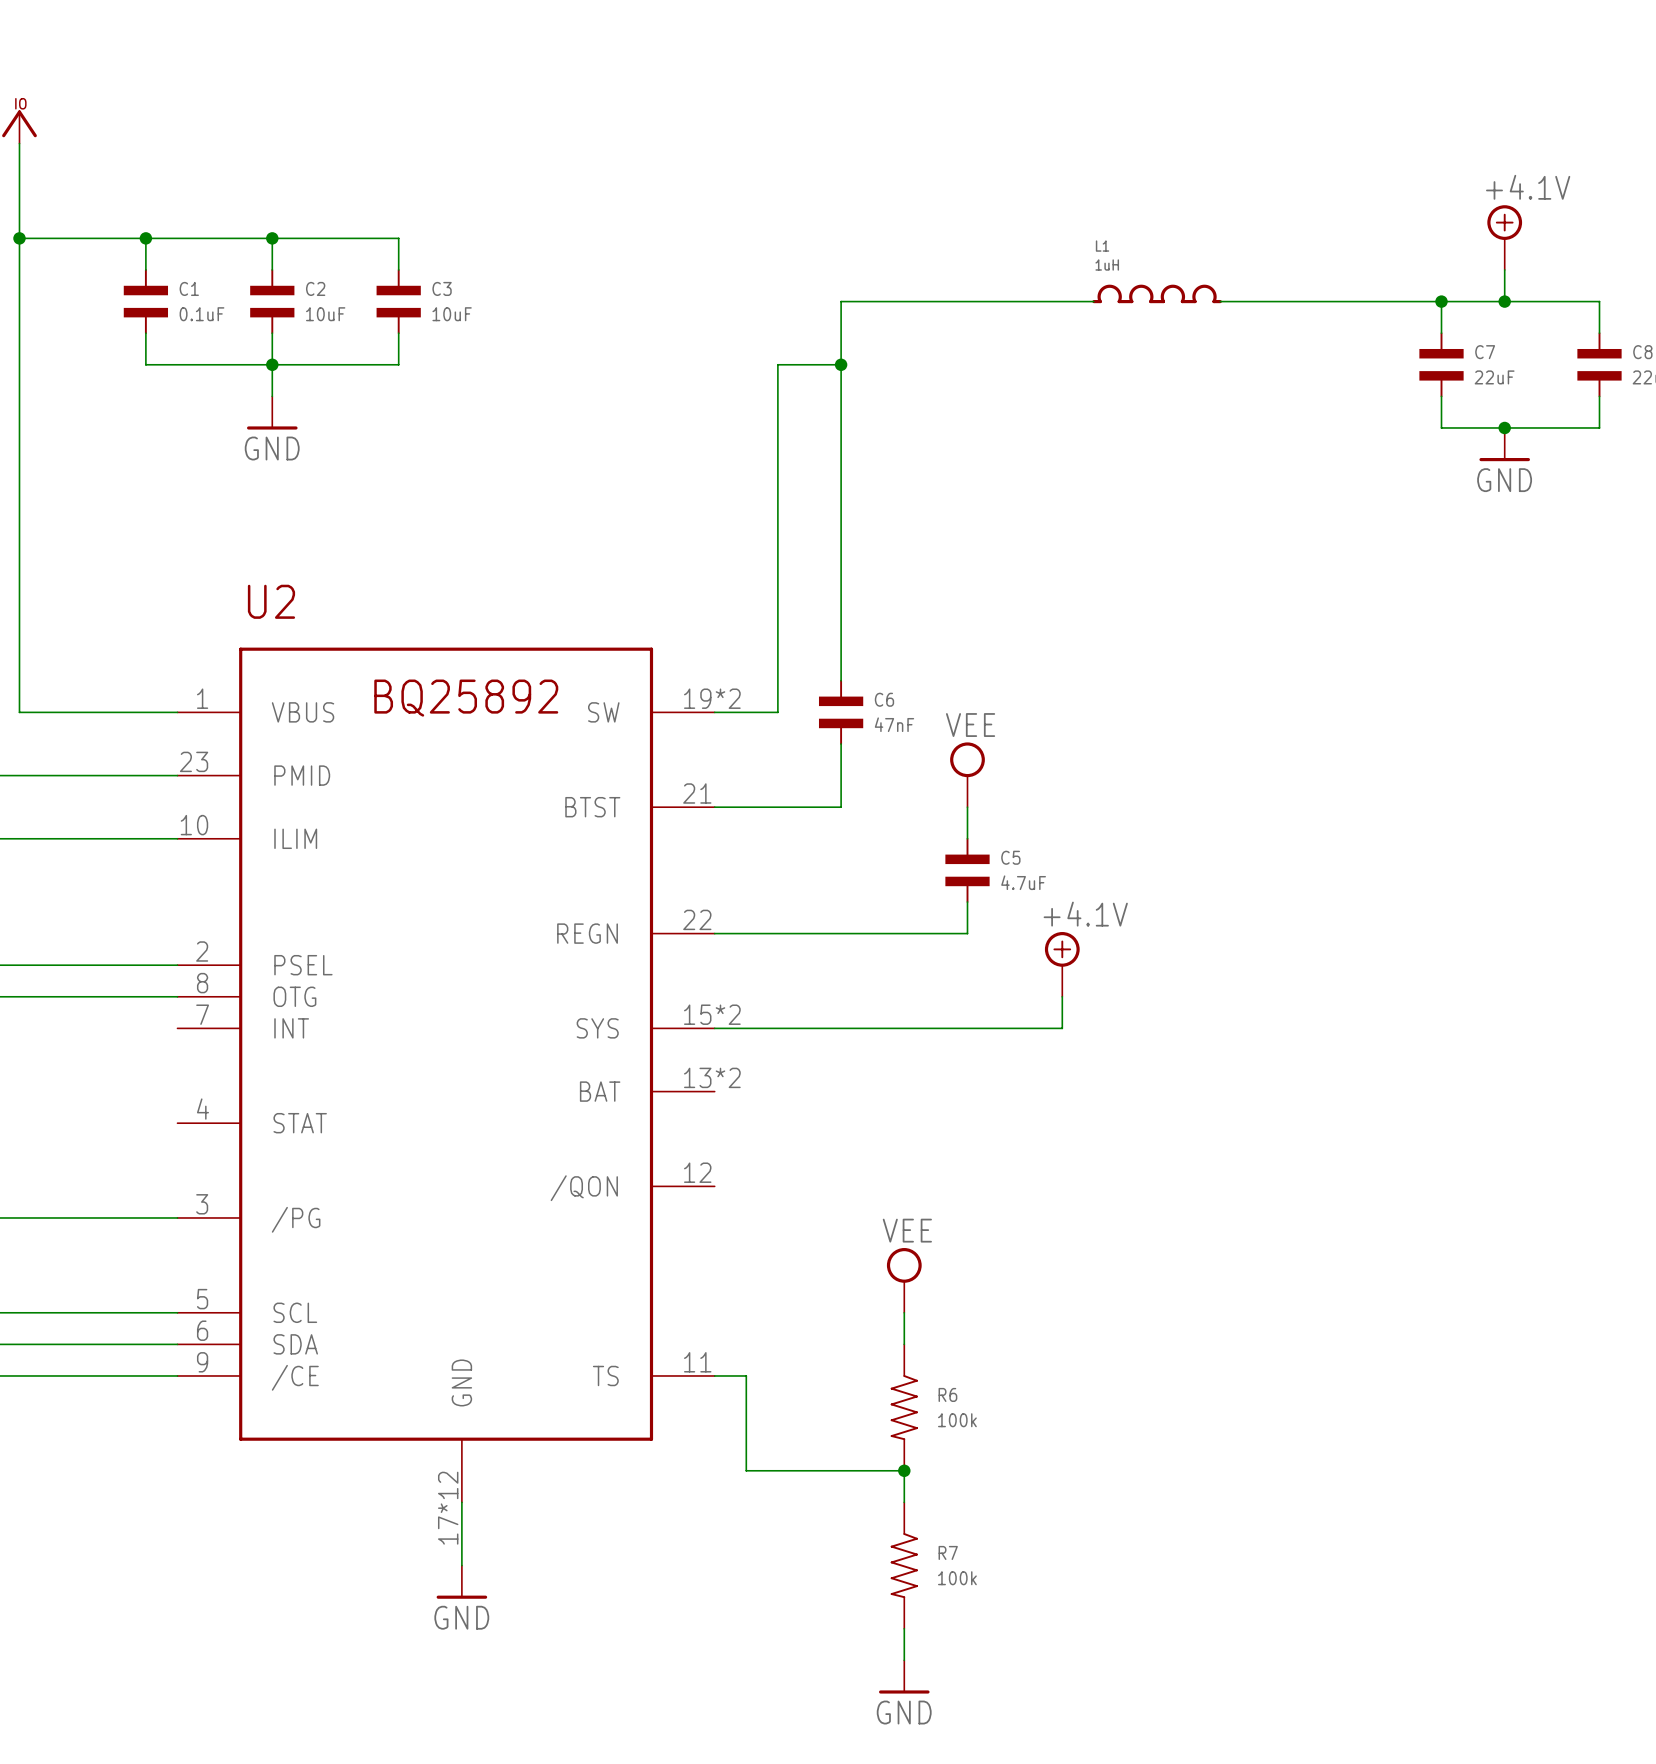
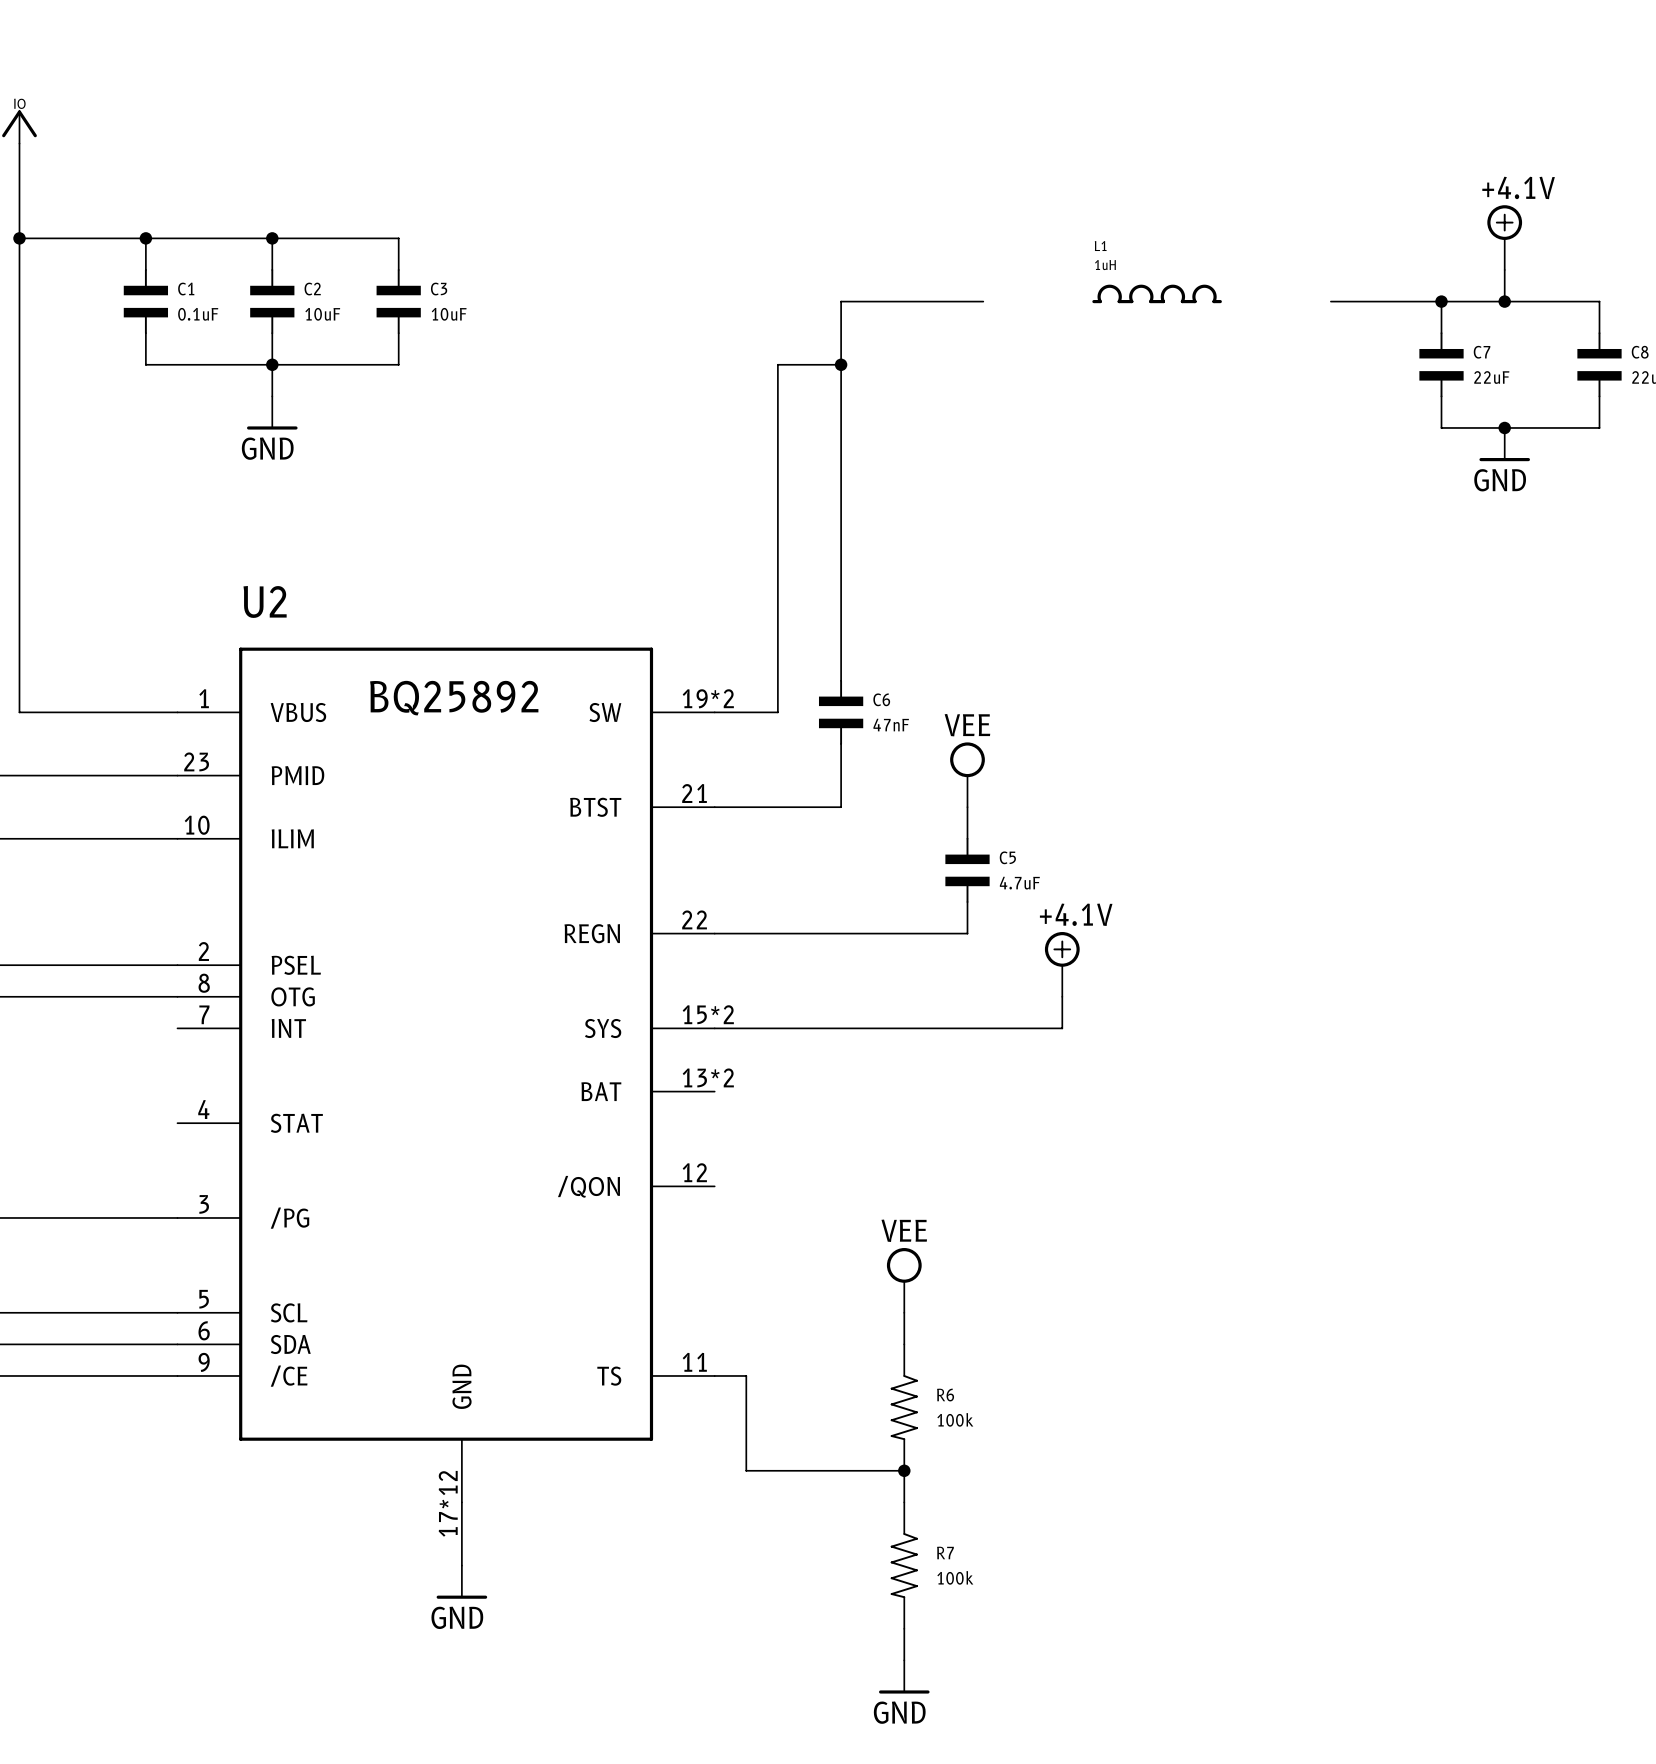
wire: (983, 301) (1093, 301) -> none
wire: (1220, 301) (1330, 301) -> none

